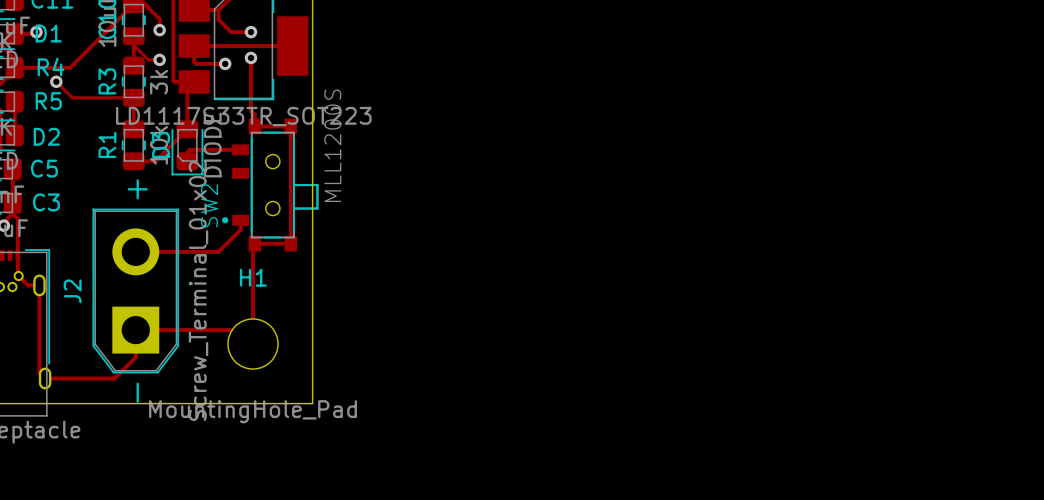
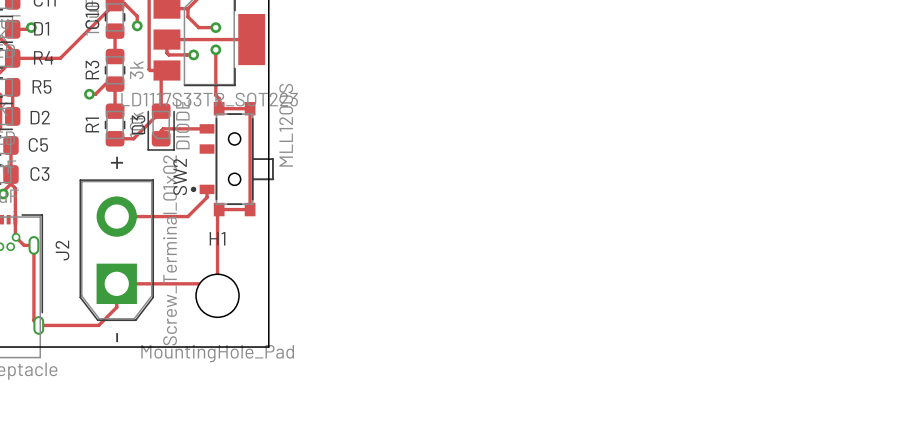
track: (133, 36) (133, 45) (148, 59) (159, 59) -> none
via: (159, 59) -> none
track: (56, 81) (72, 97) (122, 97) -> (89, 94) (95, 94) (105, 84)
via: (56, 81) -> none
via: none -> (89, 94)

